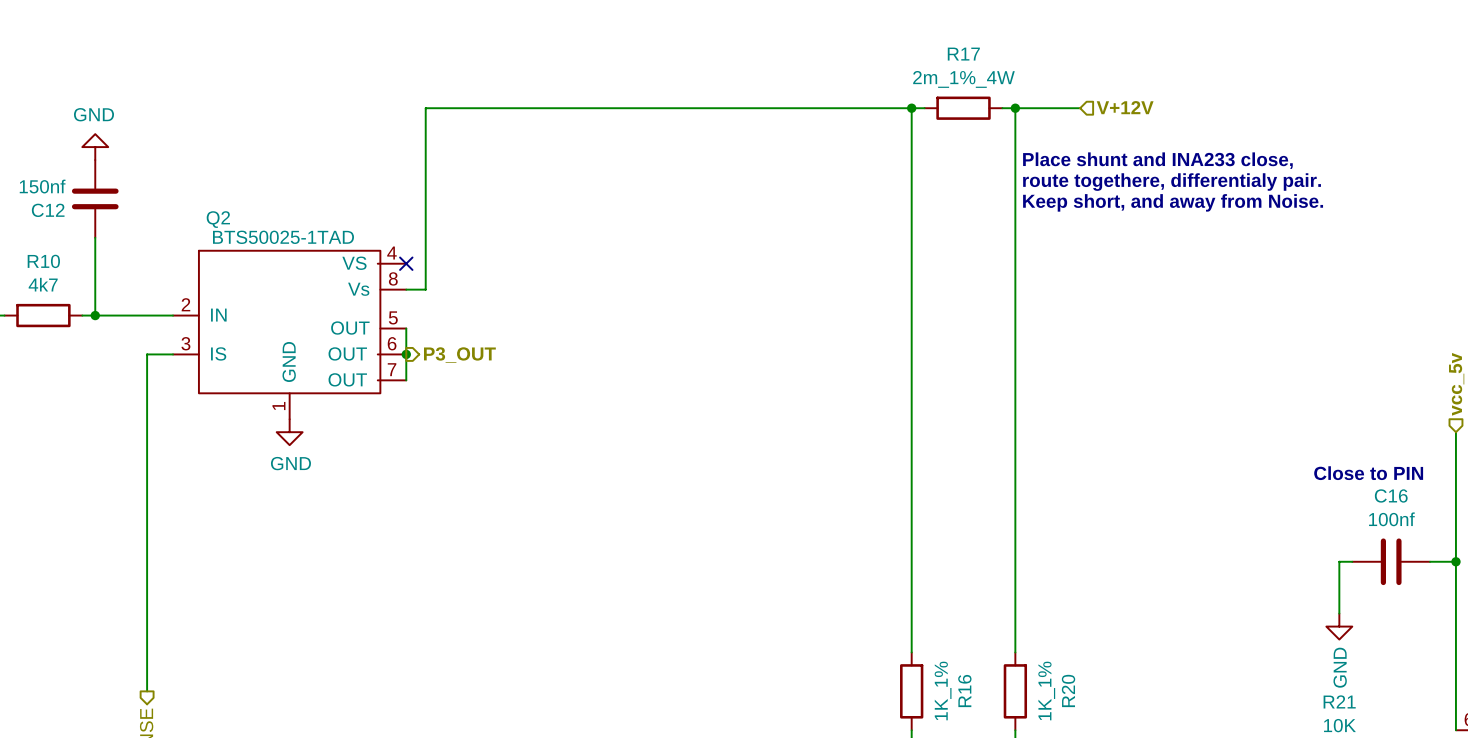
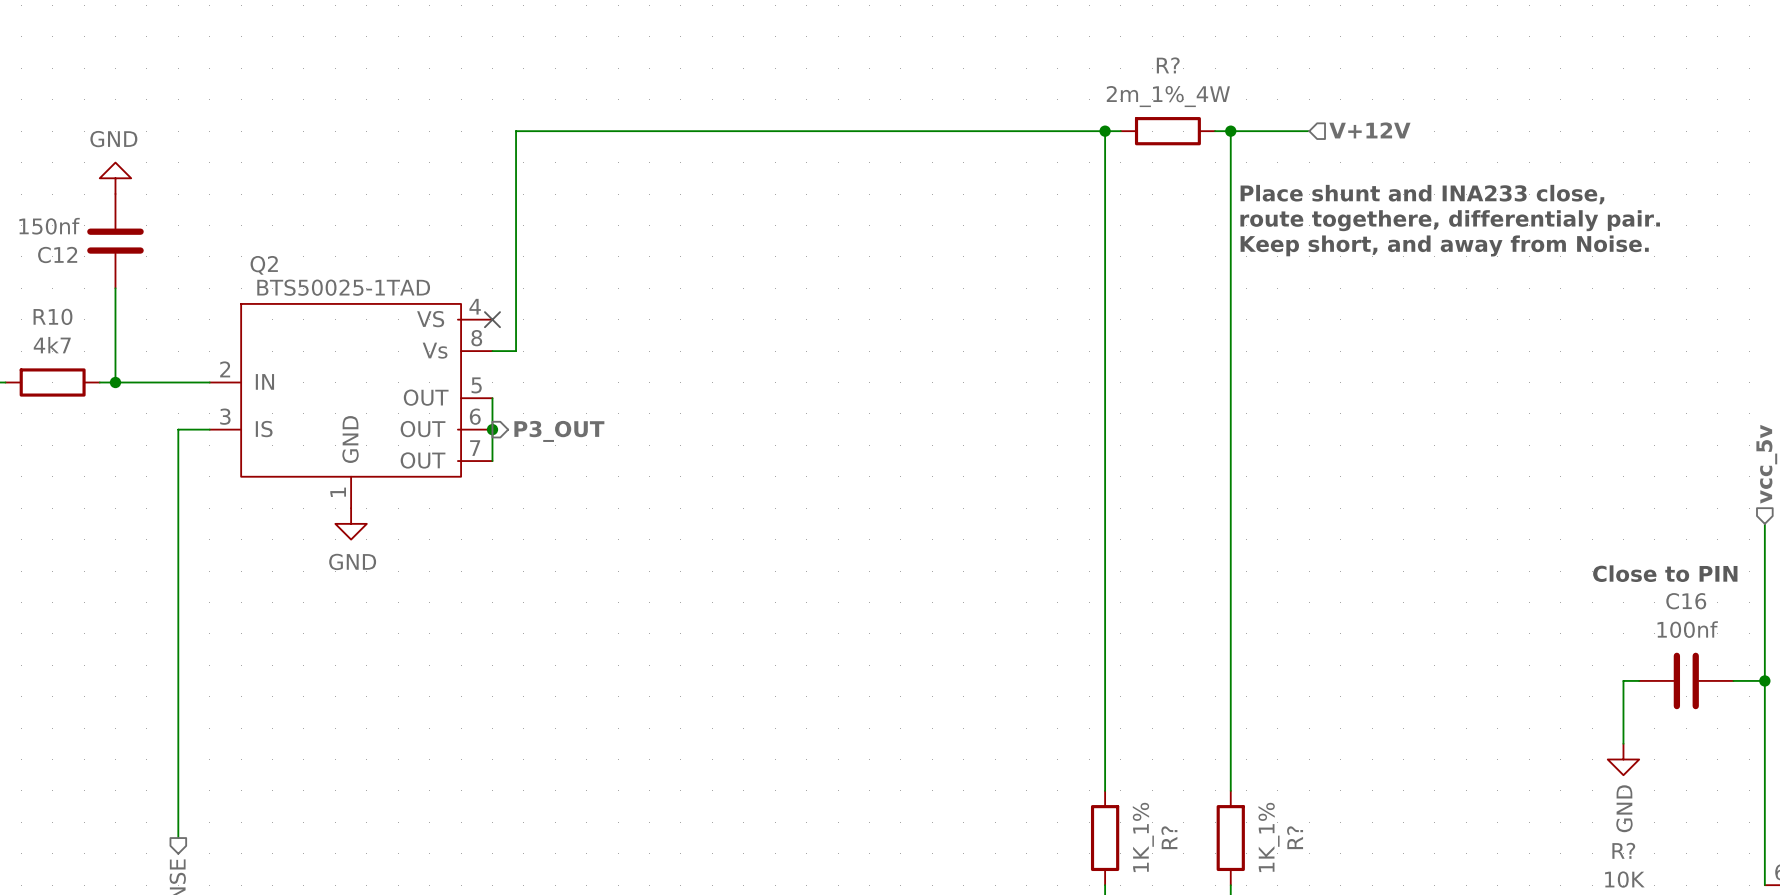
R17 name: R17 (963, 54) -> R? (1168, 65)
R20 name: R20 (1068, 690) -> R? (1295, 837)
R16 name: R16 (964, 691) -> R? (1169, 837)
R21 name: R21 (1339, 701) -> R? (1623, 850)

